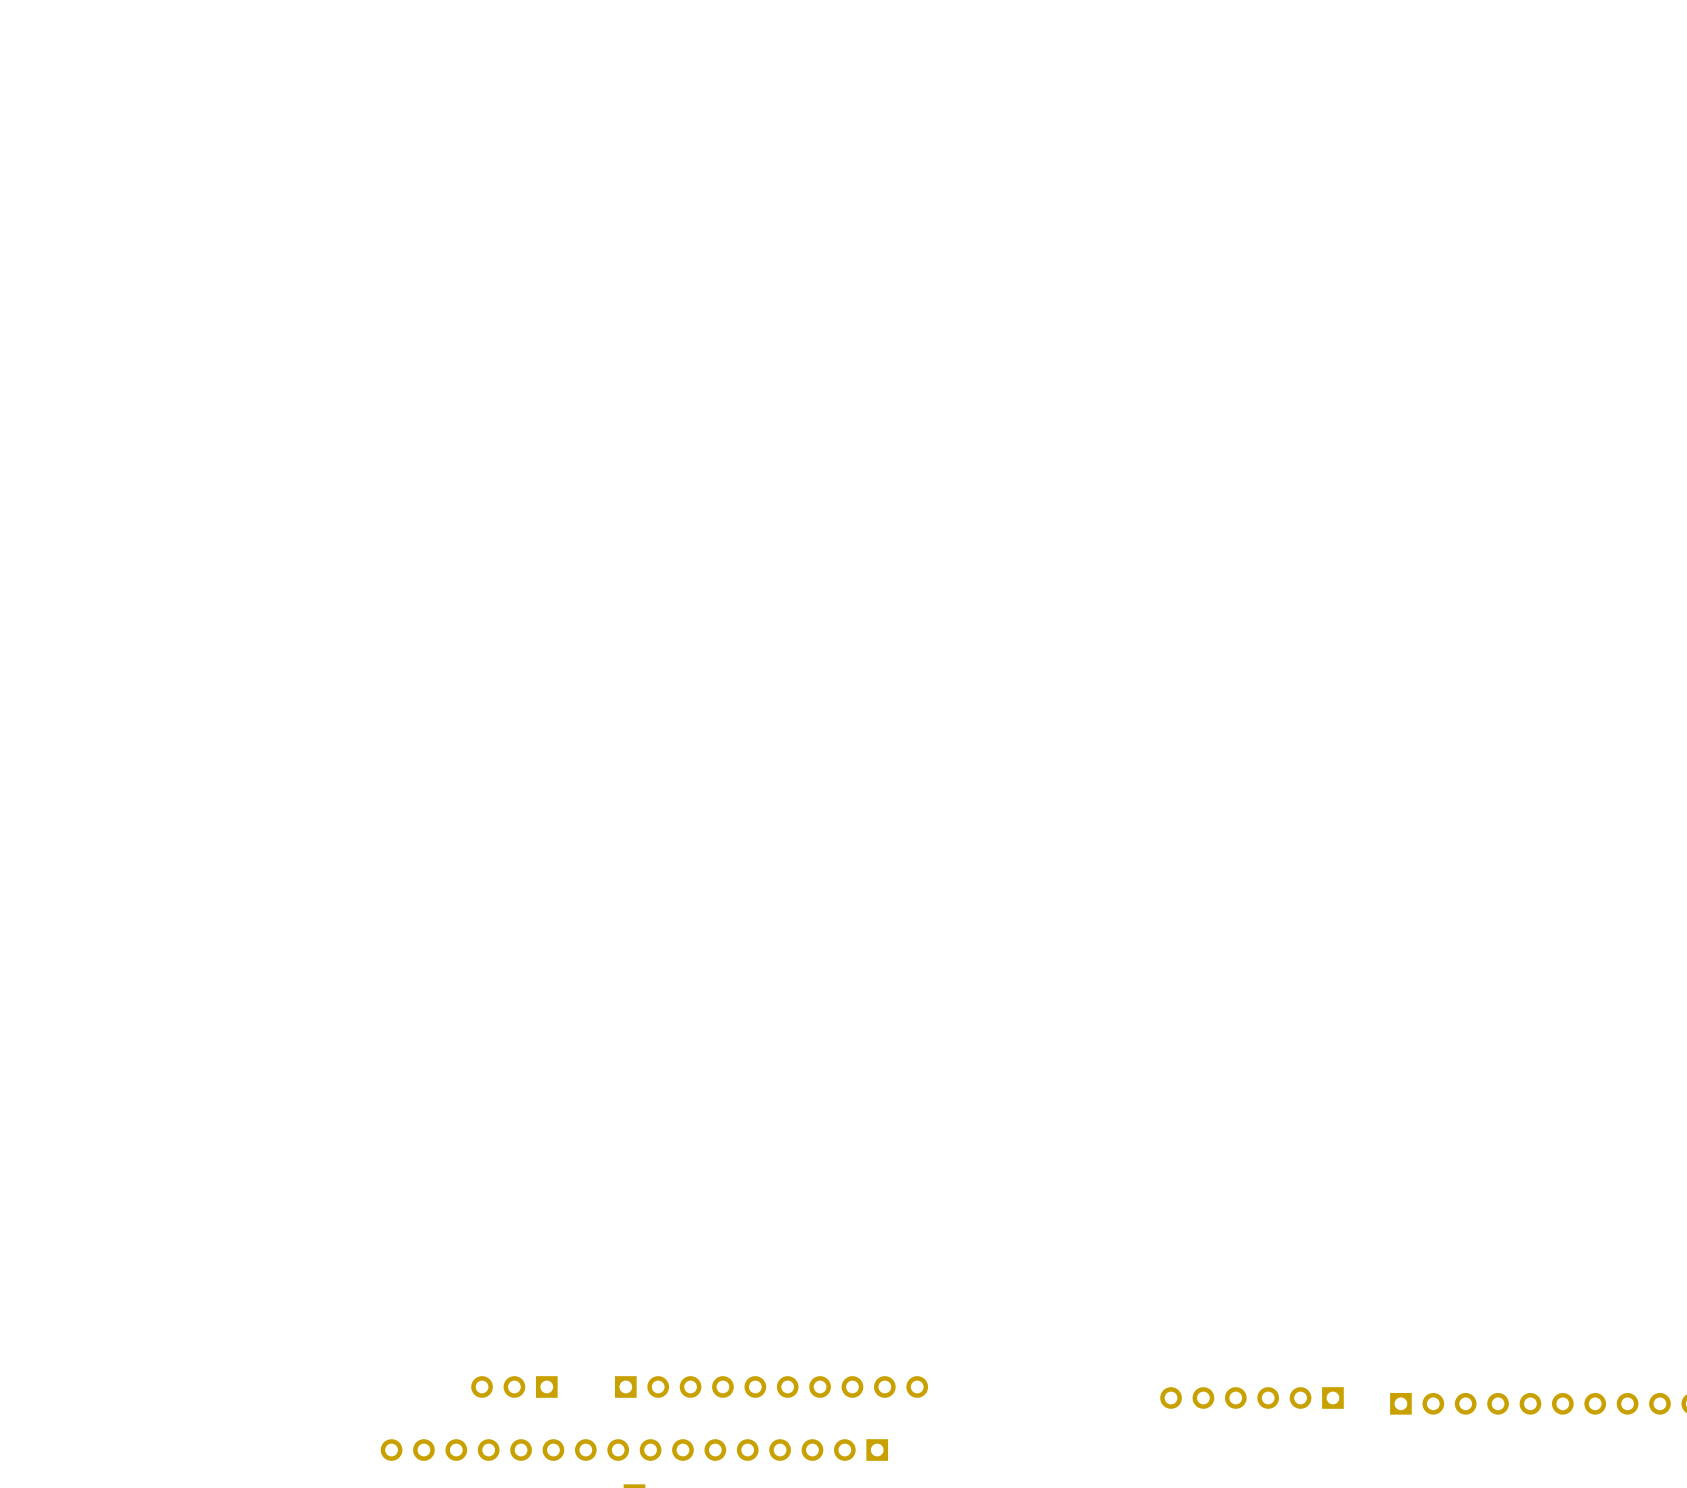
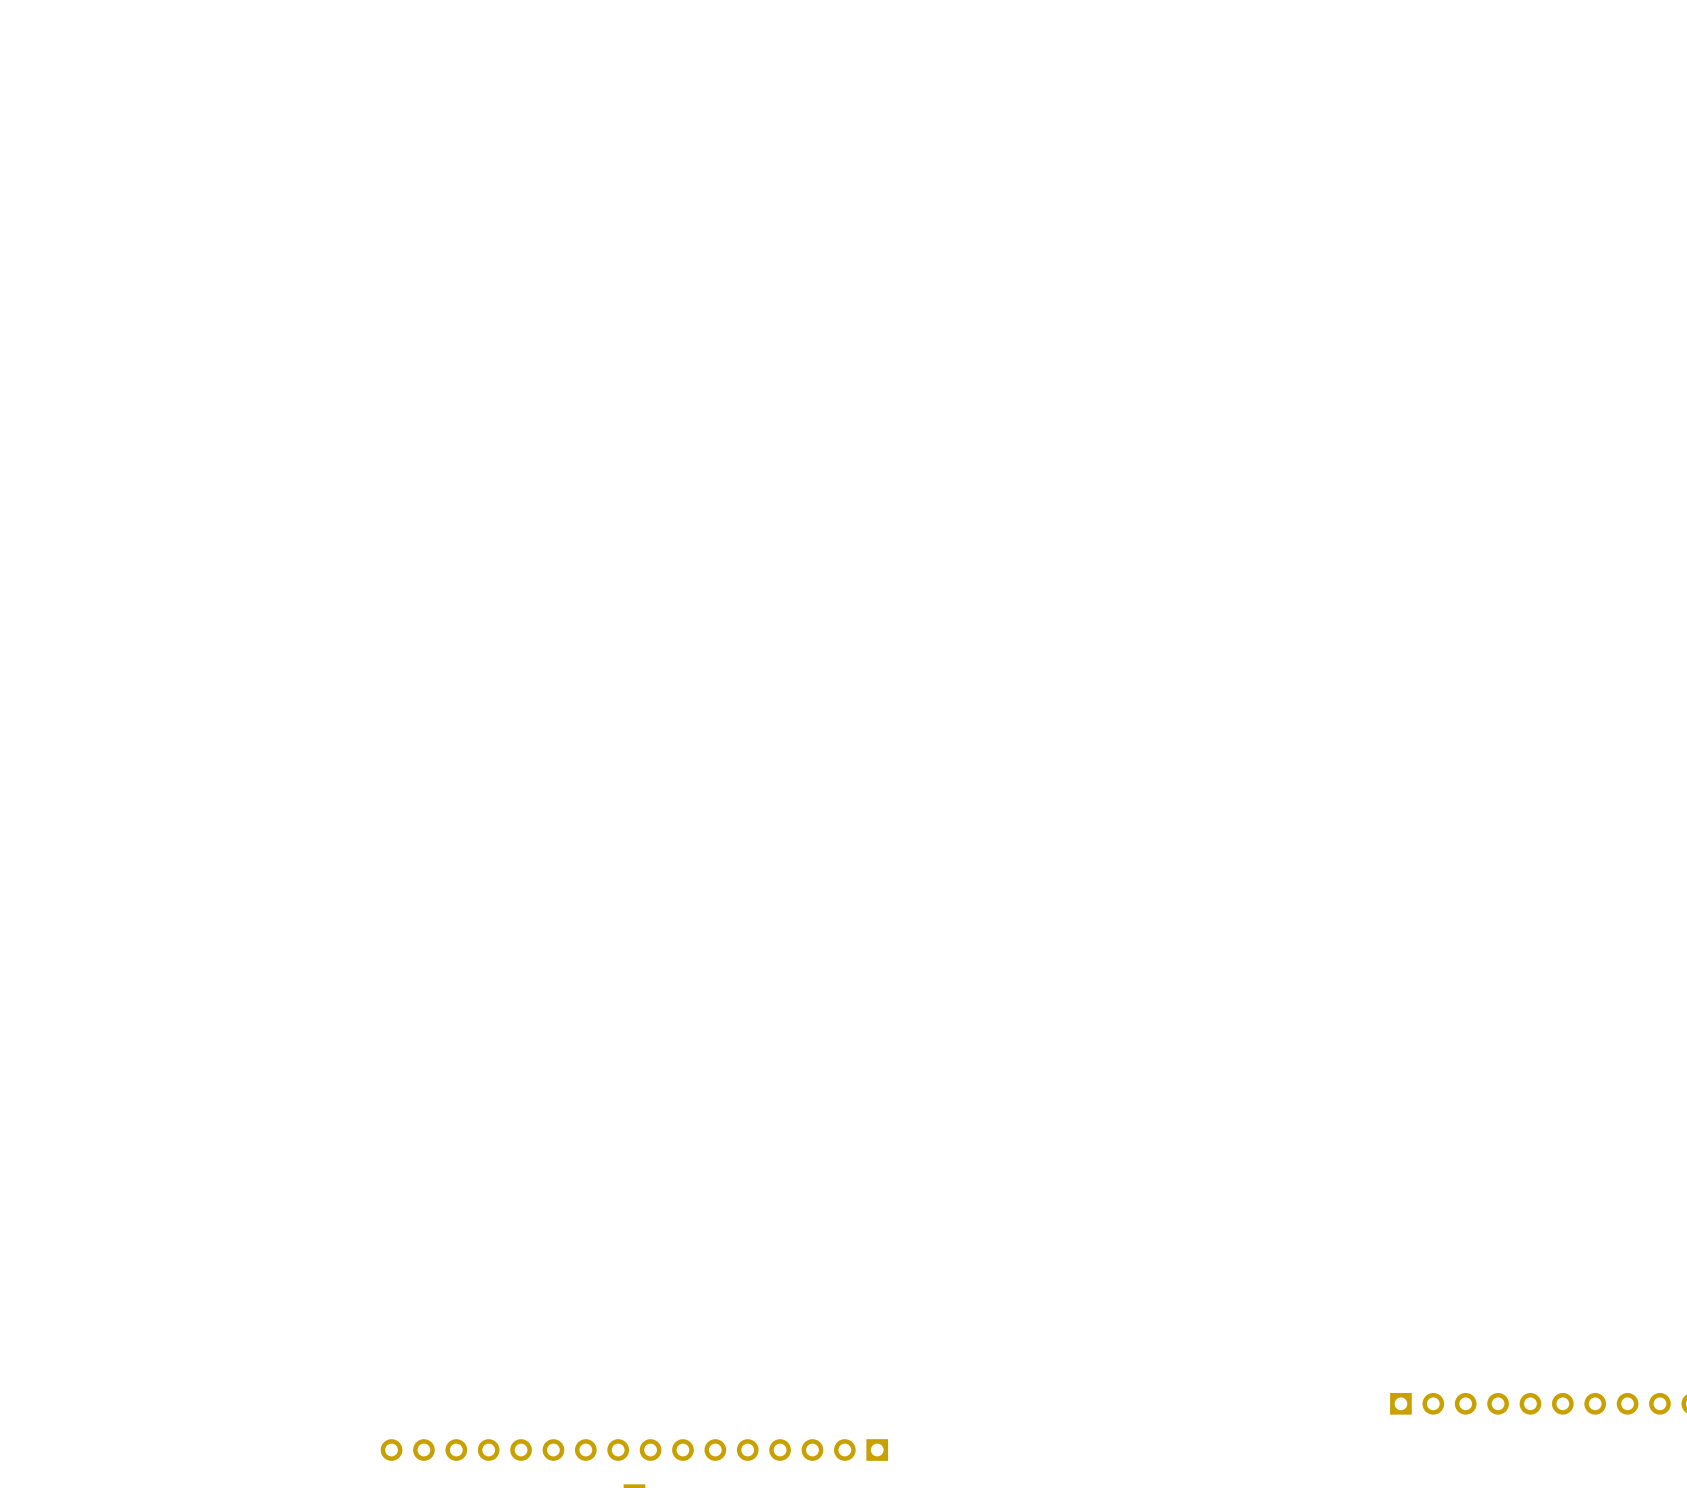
part: (514, 1386) -> none
part: (771, 1386) -> none
part: (1251, 1397) -> none

